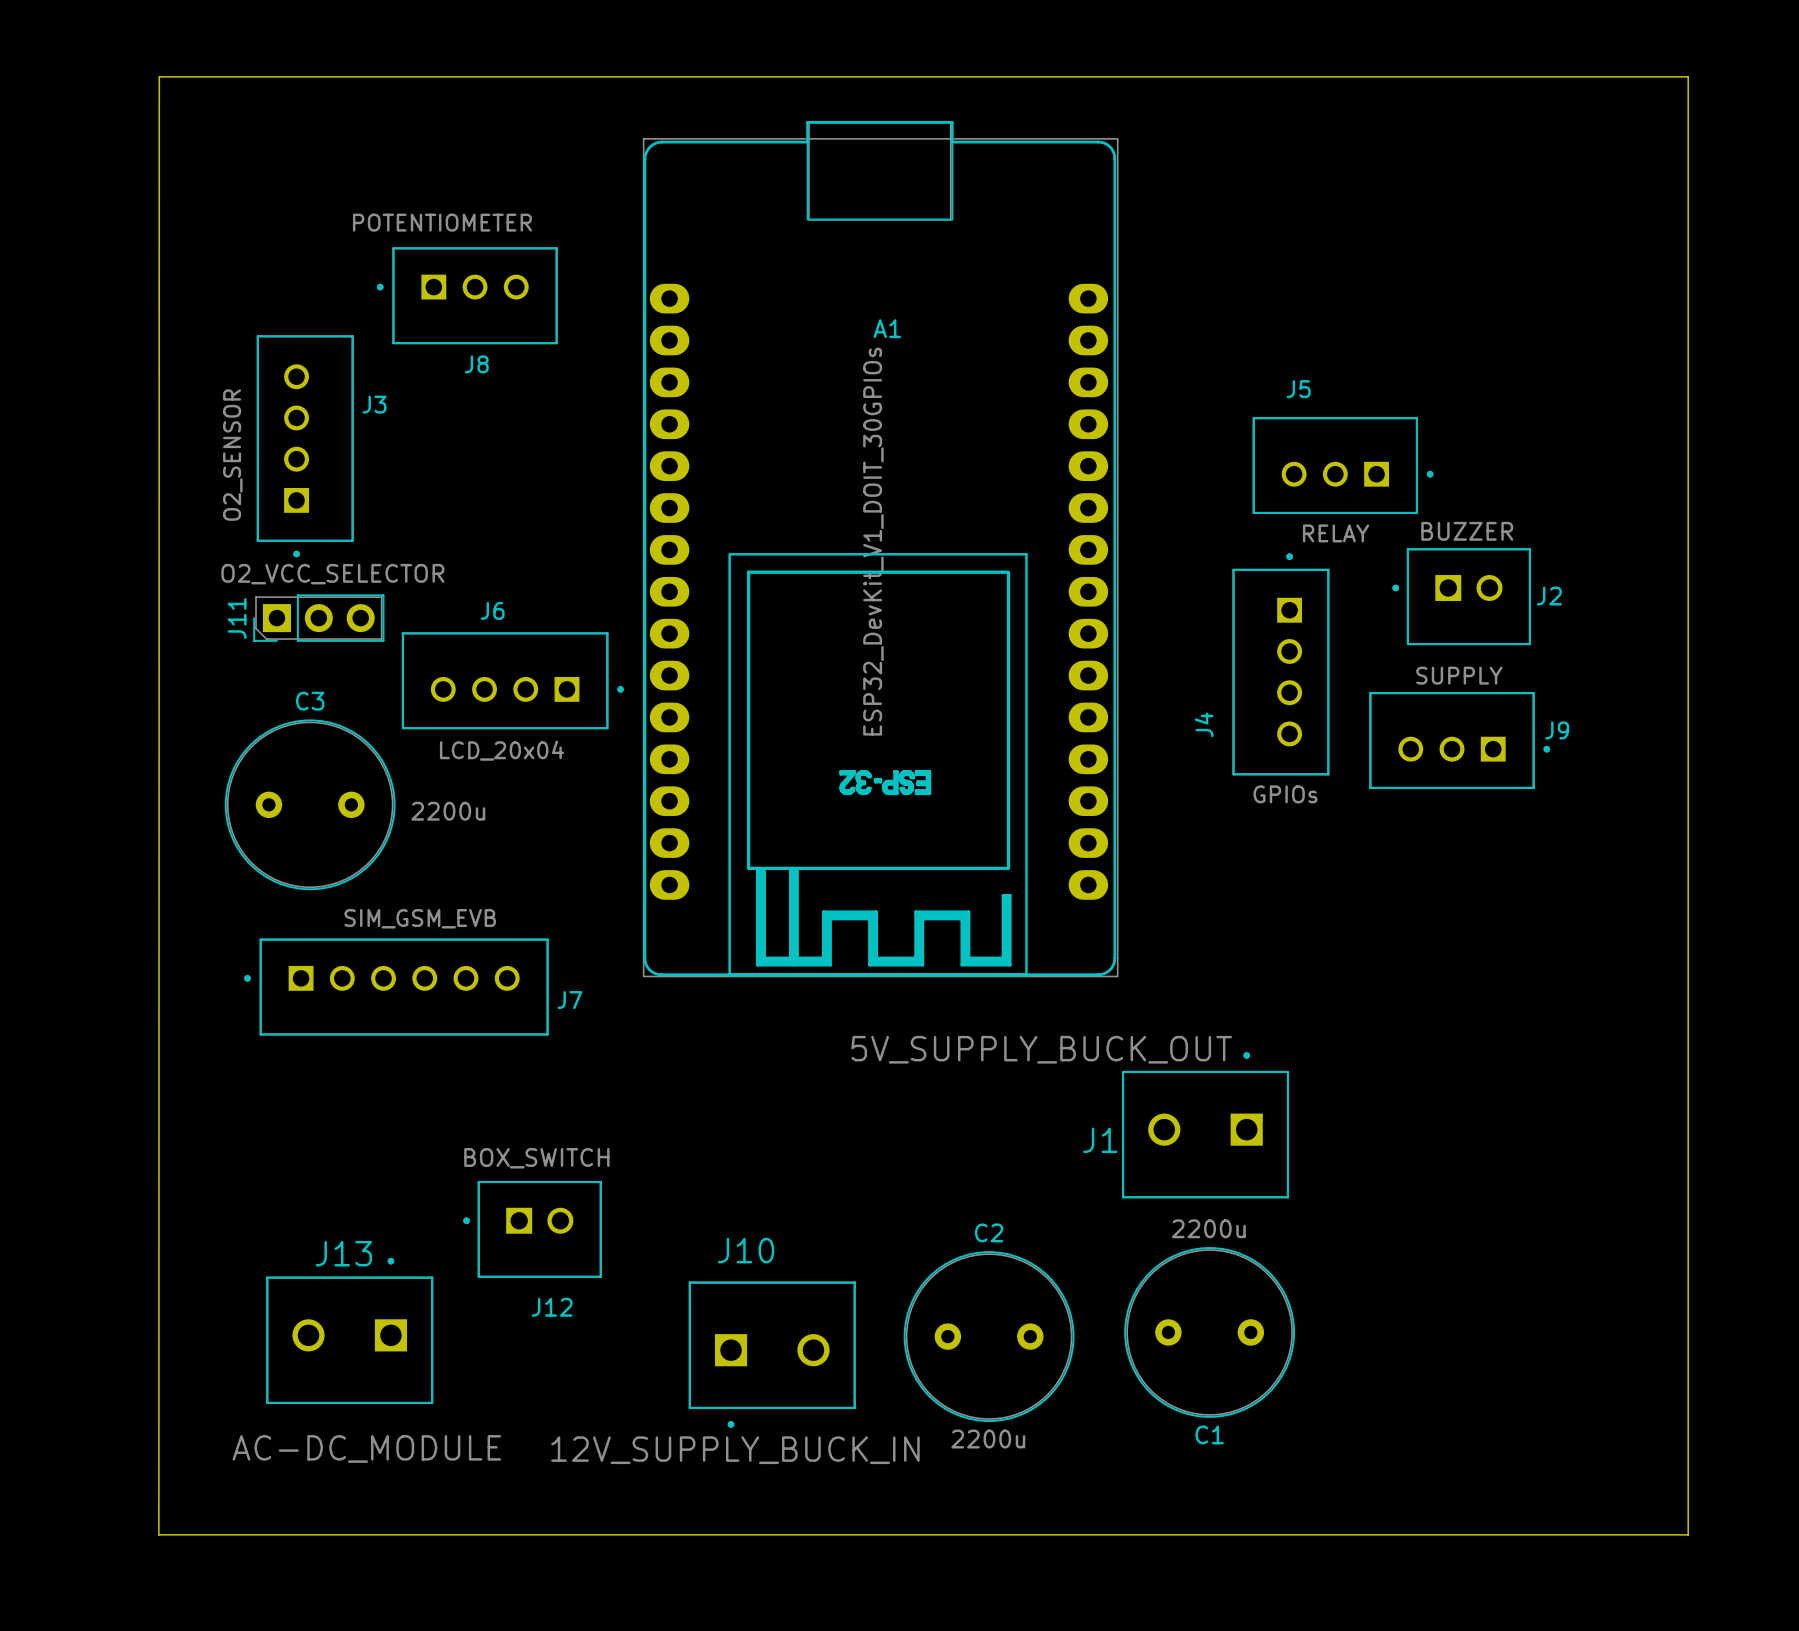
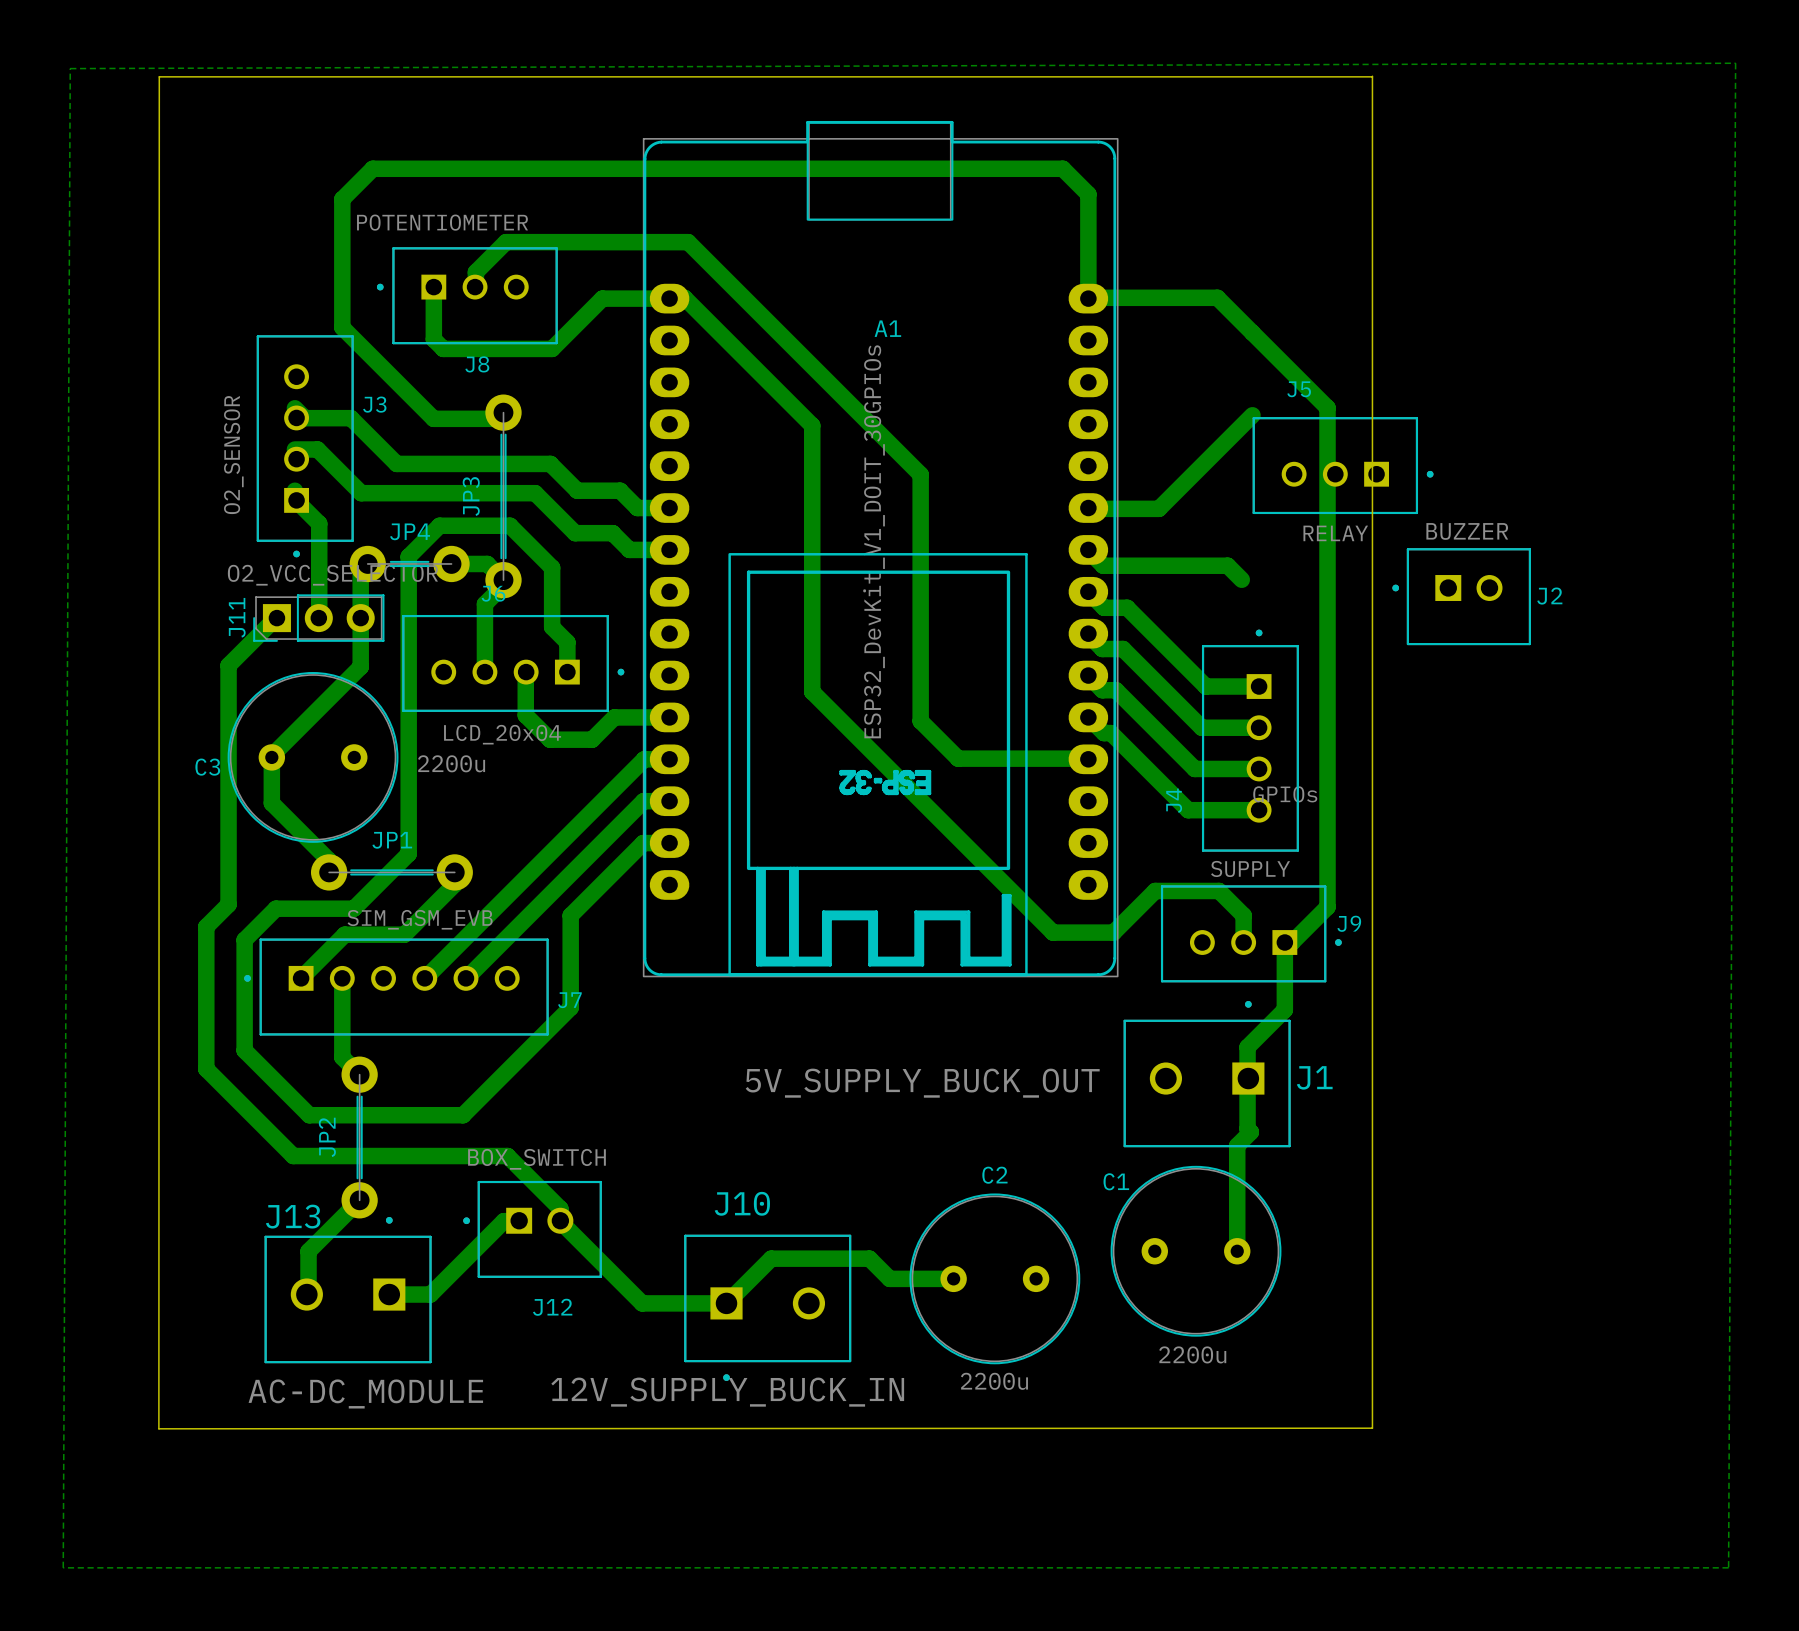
bottom zone outline: none -> (1735, 63) (70, 68) (63, 1567) (1728, 1567) (1735, 63)
board edge: (159, 76) (158, 1534) (1688, 1534) (1688, 76) (1372, 76) -> (159, 76) (158, 1428) (1372, 1428) (1372, 76)
bottom track: none -> (433, 287) (433, 339) (443, 348) (552, 348) (602, 298) (669, 298)
bottom track: none -> (475, 287) (475, 272) (505, 242) (688, 242) (920, 474) (920, 721) (958, 758) (1087, 759)
bottom track: none -> (672, 297) (684, 297) (812, 425) (812, 691) (1052, 932) (1113, 932) (1155, 890) (1219, 890) (1243, 915) (1243, 942)
bottom track: none -> (294, 408) (304, 418) (350, 418) (396, 463) (550, 463) (577, 490) (620, 490) (637, 508) (669, 508)
bottom track: none -> (503, 412) (497, 418) (433, 418) (342, 327) (342, 199) (372, 168) (1062, 168) (1088, 194) (1088, 298) (1217, 297) (1327, 407) (1327, 907) (1292, 942) (1284, 942) (1284, 1009) (1247, 1047) (1247, 1128) (1250, 1132) (1237, 1145) (1237, 1251)
bottom track: none -> (1252, 415) (1158, 508) (1087, 508)
bottom track: none -> (294, 449) (317, 449) (361, 493) (535, 493) (575, 533) (612, 533) (629, 549) (669, 549)
bottom track: none -> (294, 490) (294, 499) (319, 523) (319, 617)
JP3: none -> (503, 496)
bottom track: none -> (1087, 550) (1103, 565) (1227, 565) (1241, 579)
bottom track: none -> (367, 563) (360, 571) (360, 666) (271, 755)
JP4: none -> (409, 563)
bottom track: none -> (451, 563) (487, 563) (503, 580) (503, 585) (484, 604) (484, 672)
bottom track: none -> (1087, 591) (1104, 607) (1127, 607) (1205, 686) (1259, 686)
bottom track: none -> (276, 617) (228, 665) (228, 904) (206, 926) (206, 1069) (293, 1156) (507, 1156) (560, 1208) (560, 1221) (642, 1303) (726, 1303) (771, 1258) (869, 1258) (889, 1278) (953, 1278)
bottom track: none -> (1087, 634) (1102, 649) (1123, 649) (1201, 727) (1259, 727)
J4 position: (1280, 664) -> (1250, 740)
bottom track: none -> (526, 672) (525, 715) (550, 739) (592, 739) (614, 717) (669, 717)
bottom track: none -> (567, 672) (567, 642) (552, 627) (552, 567) (510, 525) (439, 525) (408, 556) (408, 853) (353, 908) (275, 908) (244, 940) (244, 1050) (309, 1115) (463, 1115) (570, 1007) (570, 915) (643, 843) (669, 843)
bottom track: none -> (1087, 675) (1102, 690) (1116, 690) (1194, 768) (1259, 768)
J6 position: (512, 680) -> (513, 663)
C3 name position: C3 (310, 701) -> C3 (207, 767)
bottom track: none -> (1088, 717) (1104, 733) (1111, 733) (1188, 810) (1259, 810)
J9 position: (1459, 740) -> (1251, 933)
bottom track: none -> (271, 757) (271, 803) (329, 860) (329, 872)
bottom track: none -> (669, 759) (644, 759) (424, 978)
bottom track: none -> (669, 801) (643, 801) (465, 978)
C3 position: (310, 804) -> (313, 757)
JP1: none -> (391, 872)
bottom track: none -> (454, 872) (454, 884) (404, 934) (344, 934) (301, 978)
bottom track: none -> (342, 978) (342, 1057) (359, 1074)
J1 value position: 5V_SUPPLY_BUCK_OUT (1041, 1049) -> 5V_SUPPLY_BUCK_OUT (922, 1083)
J1 position: (1205, 1125) -> (1207, 1074)
JP2: none -> (359, 1137)
J1 name position: J1 (1100, 1140) -> J1 (1314, 1077)
bottom track: none -> (359, 1200) (308, 1251) (308, 1292) (306, 1294)
bottom track: none -> (518, 1221) (503, 1221) (430, 1294) (389, 1294)
C1 value position: 2200u (1208, 1228) -> 2200u (1192, 1354)
J13 name position: J13 (343, 1253) -> J13 (293, 1216)
J13 position: (349, 1330) -> (348, 1290)
C1 position: (1209, 1332) -> (1196, 1251)
C2 position: (989, 1336) -> (994, 1278)
J10 position: (772, 1354) -> (767, 1307)
C1 name position: C1 (1209, 1434) -> C1 (1116, 1181)
J13 value position: AC-DC_MODULE (366, 1448) -> AC-DC_MODULE (365, 1393)
J10 value position: 12V_SUPPLY_BUCK_IN (735, 1450) -> 12V_SUPPLY_BUCK_IN (727, 1392)

